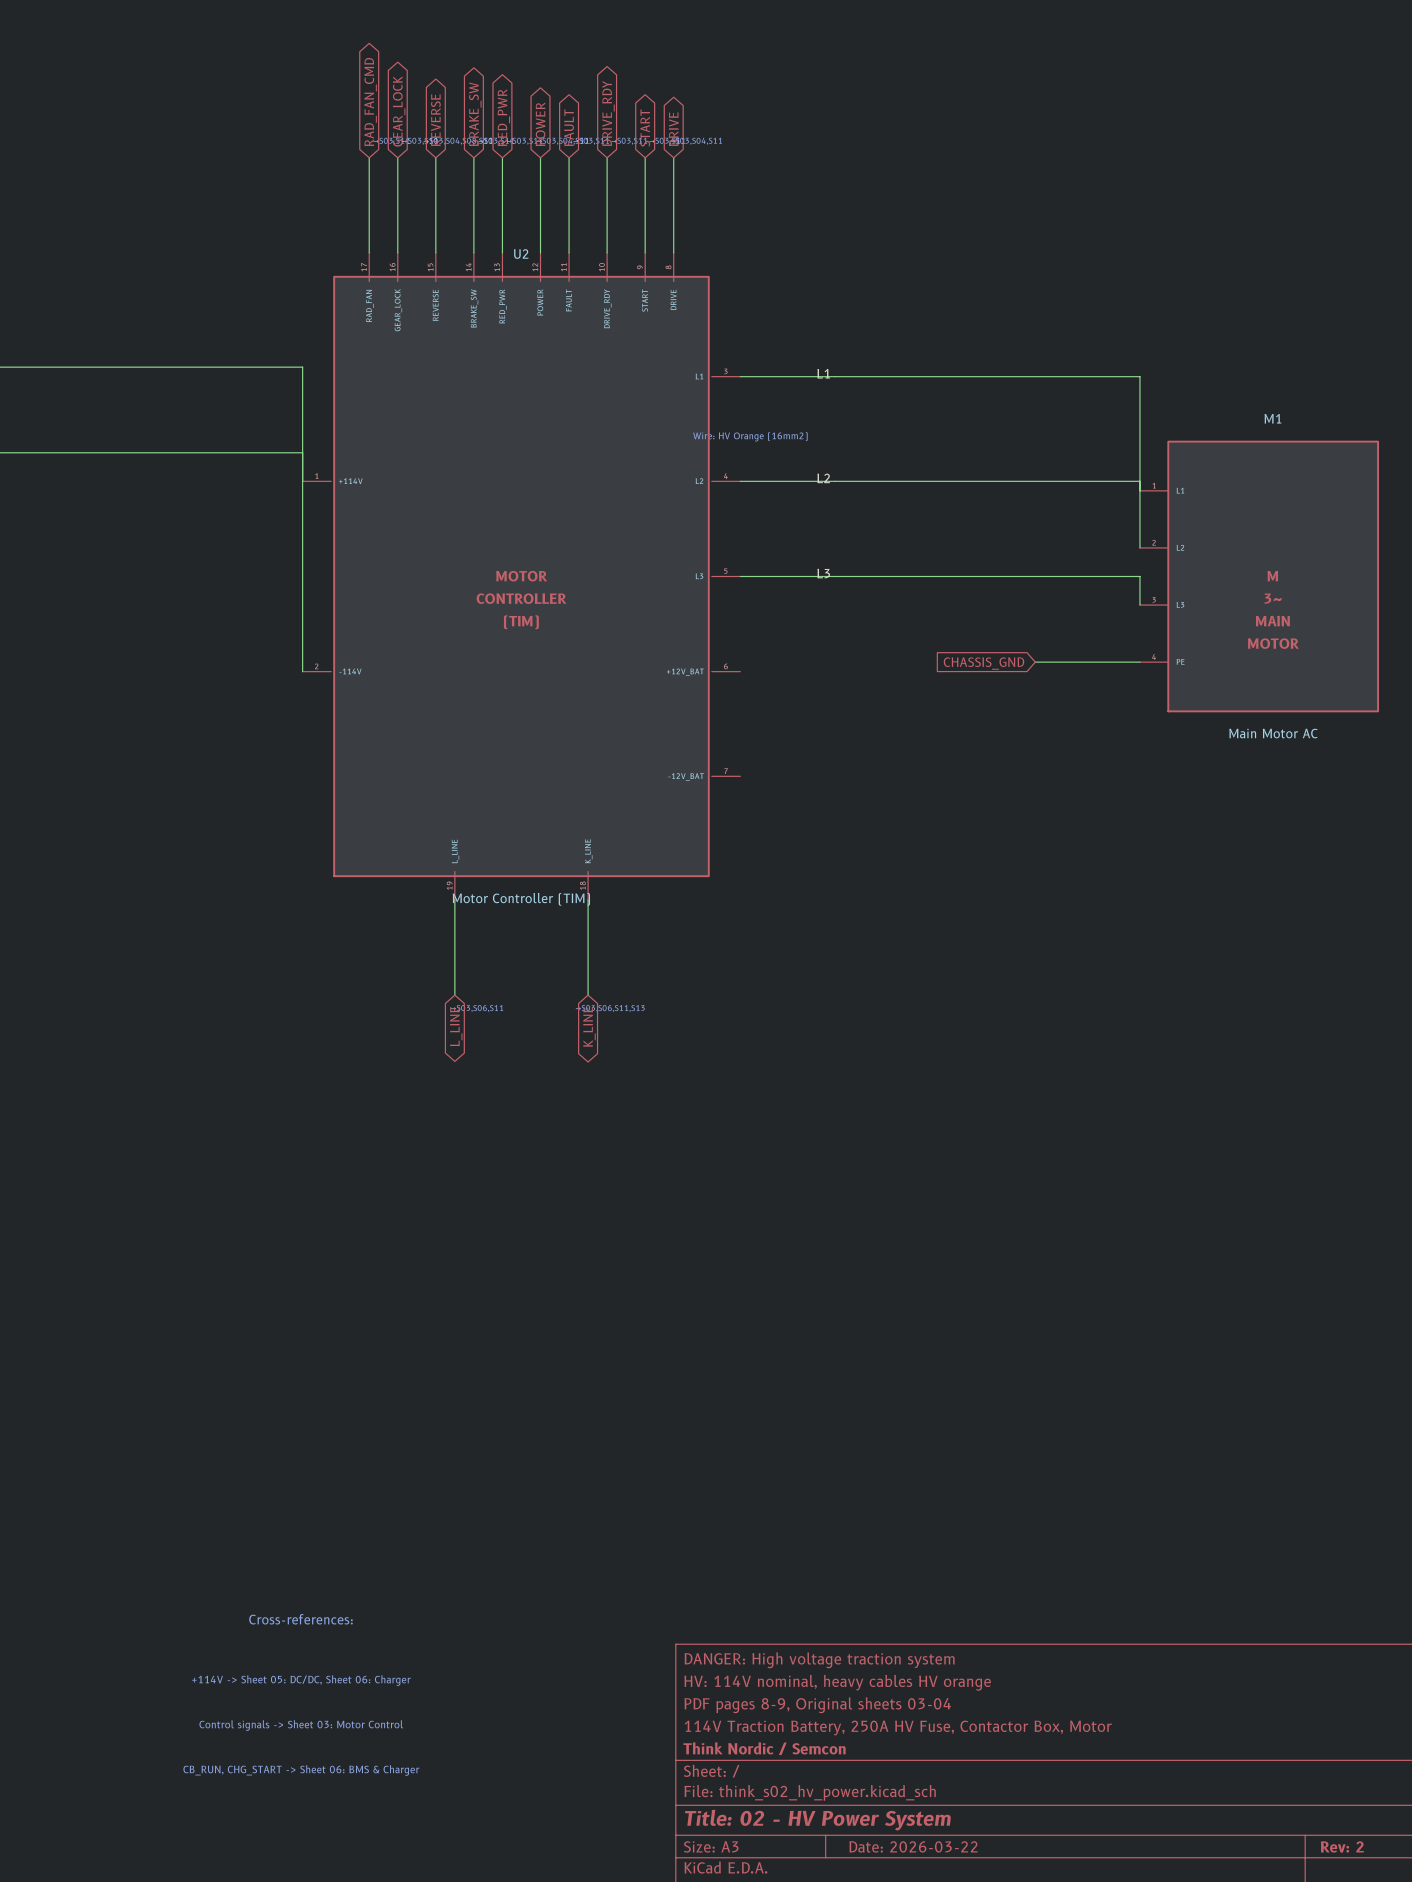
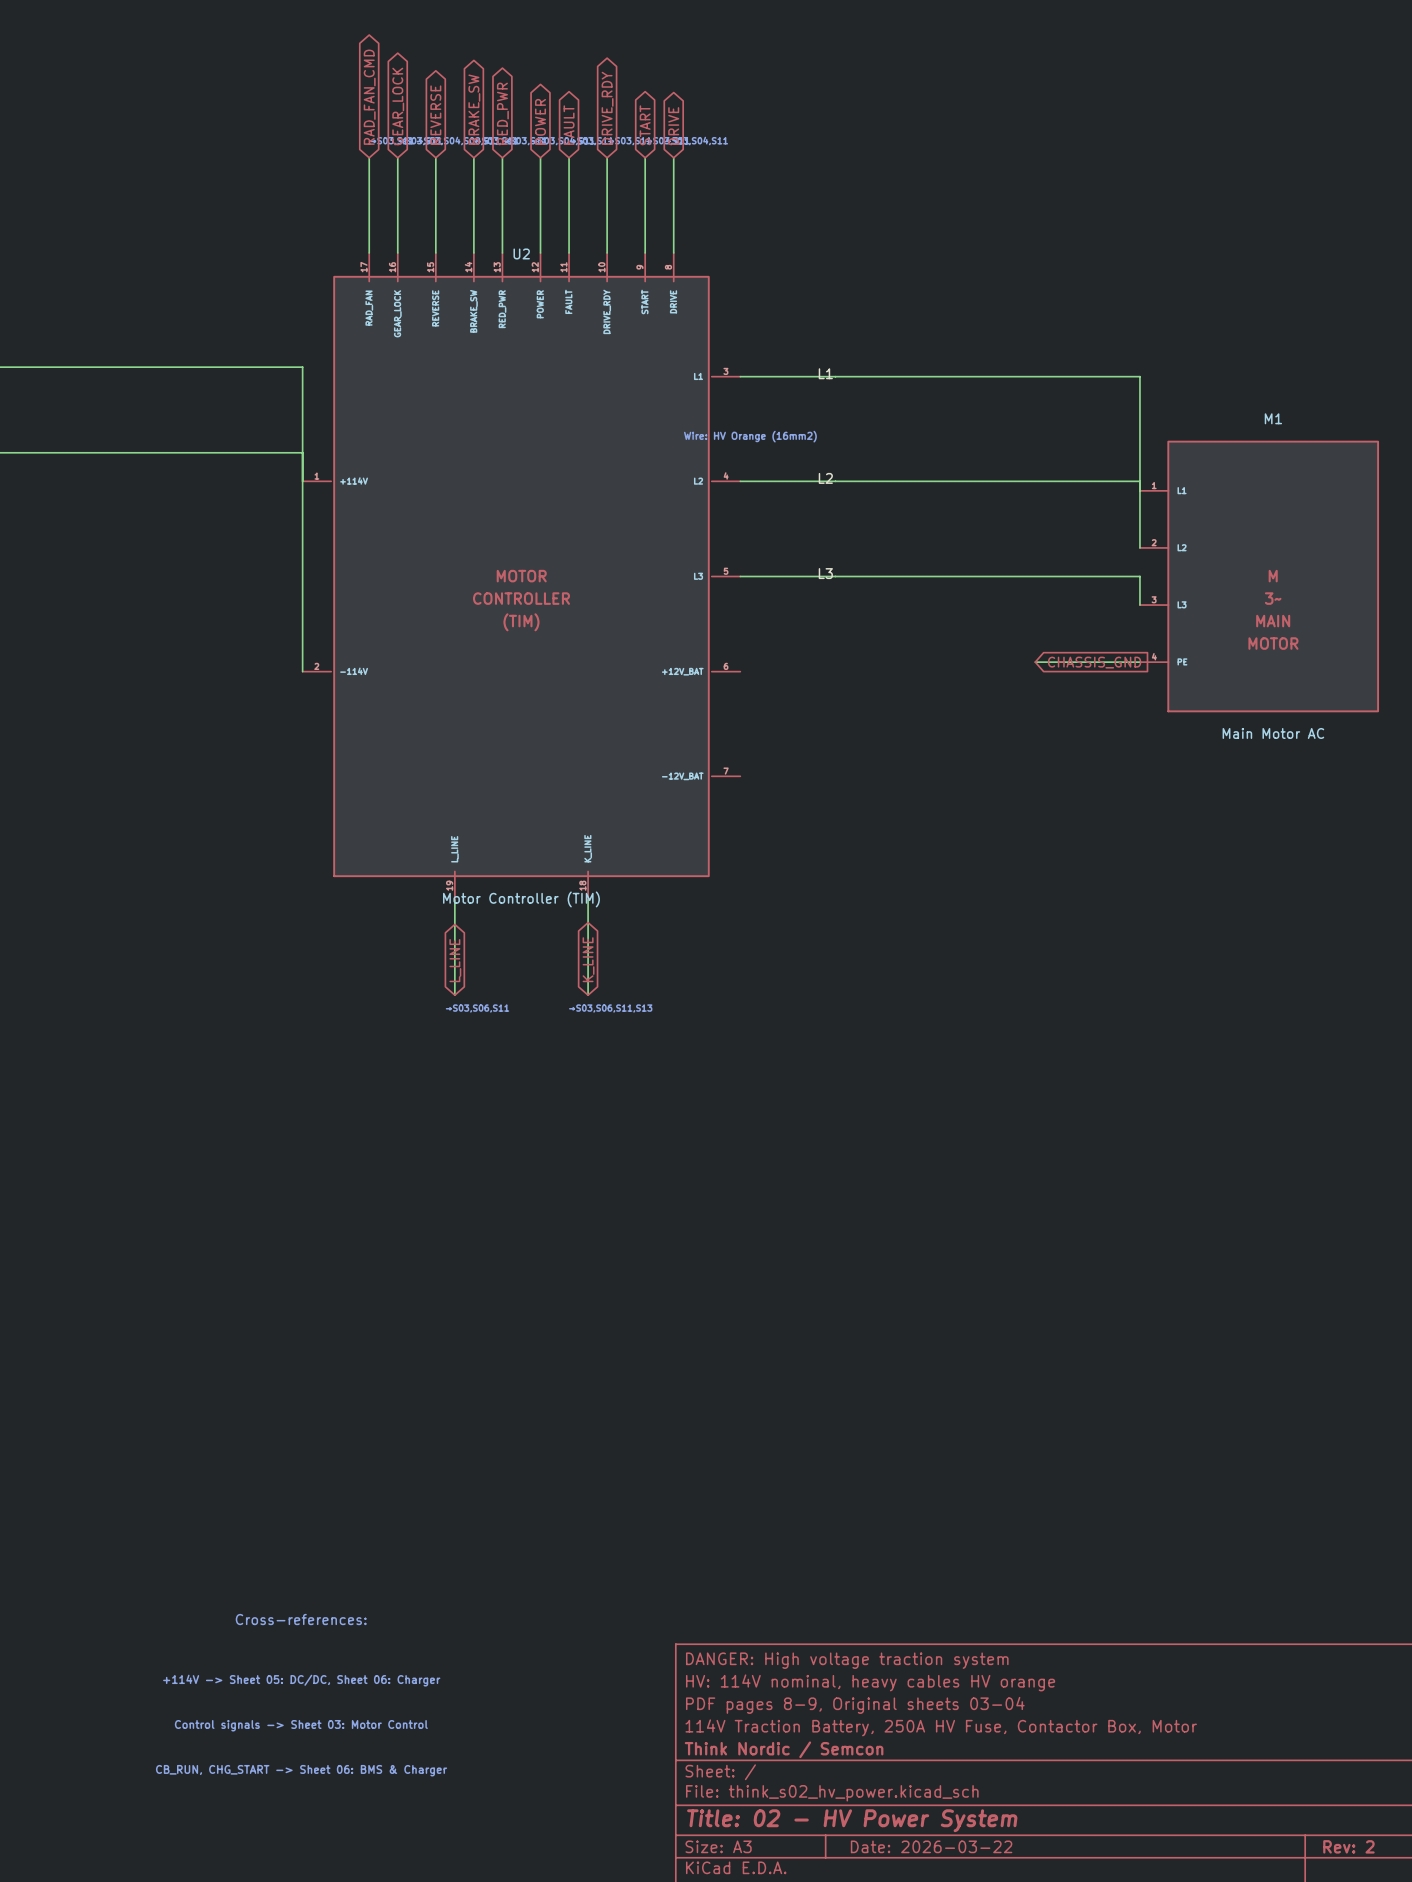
global label rotation: 0° (984, 663) -> 180° (1094, 662)
global label rotation: 0° (456, 1026) -> 180° (455, 960)
global label rotation: 0° (589, 1026) -> 180° (588, 959)

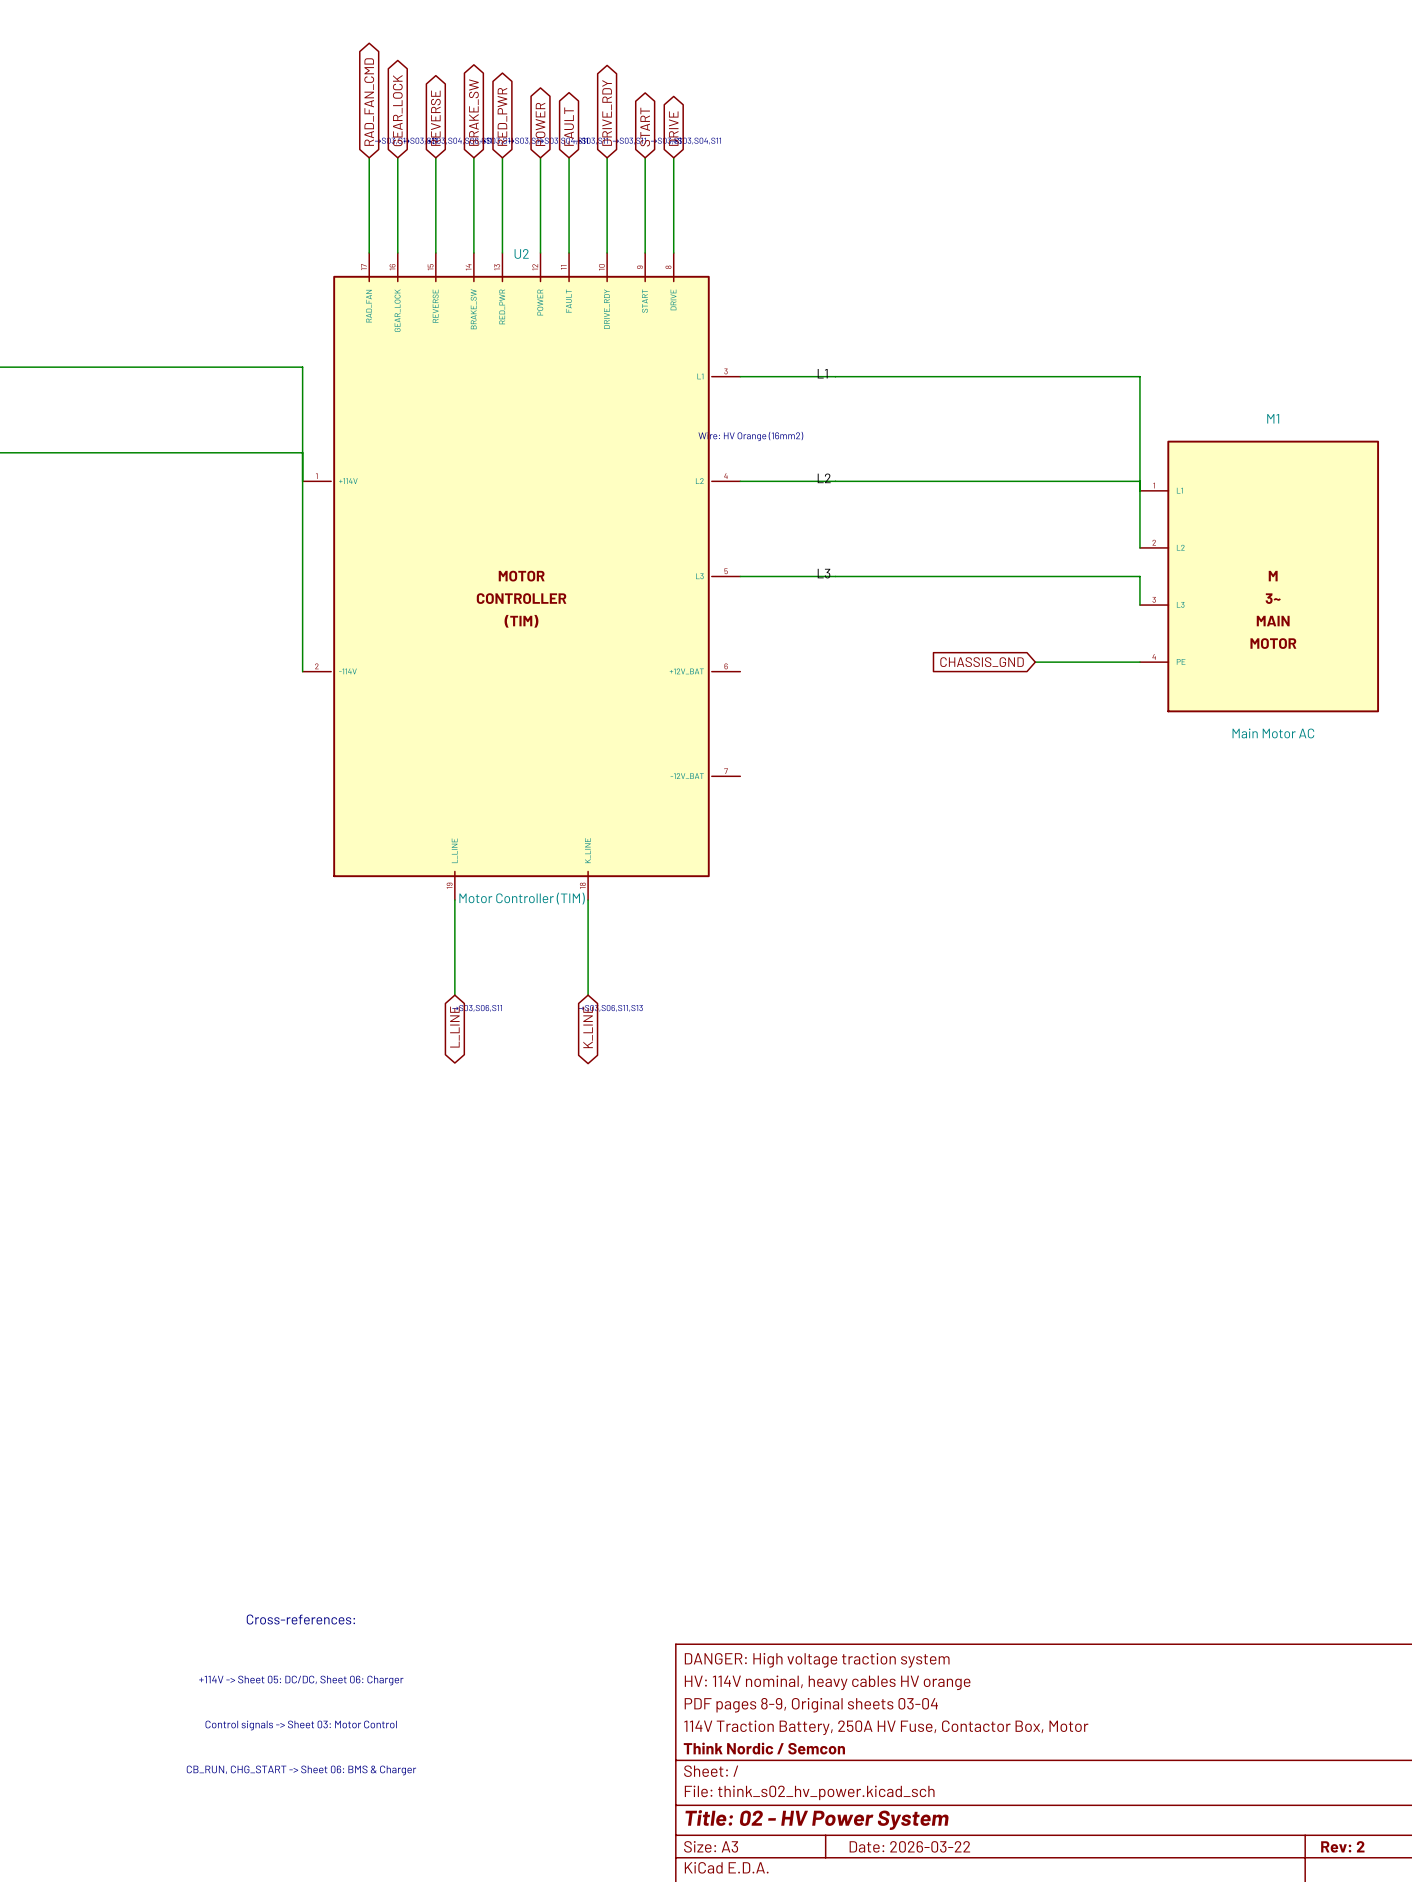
global label rotation: 0° (1094, 662) -> 180° (982, 662)
global label rotation: 0° (588, 959) -> 180° (588, 1027)
global label rotation: 0° (455, 960) -> 180° (454, 1027)

